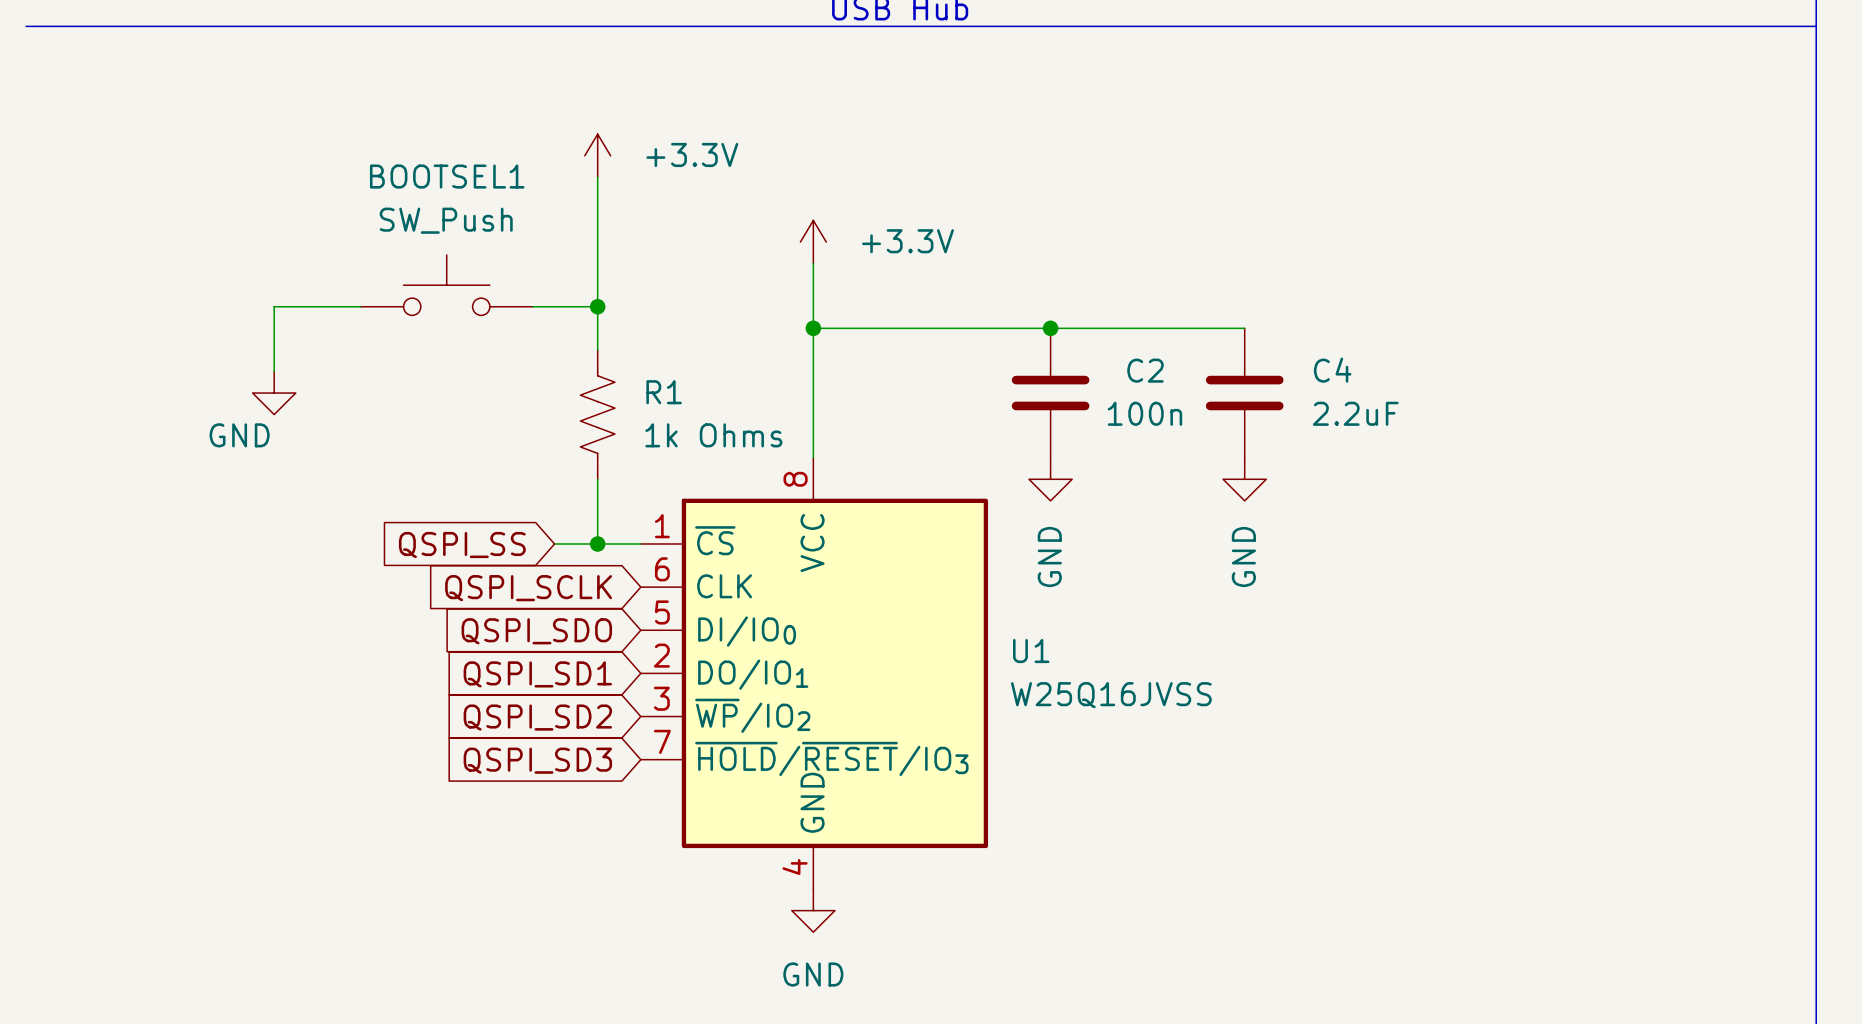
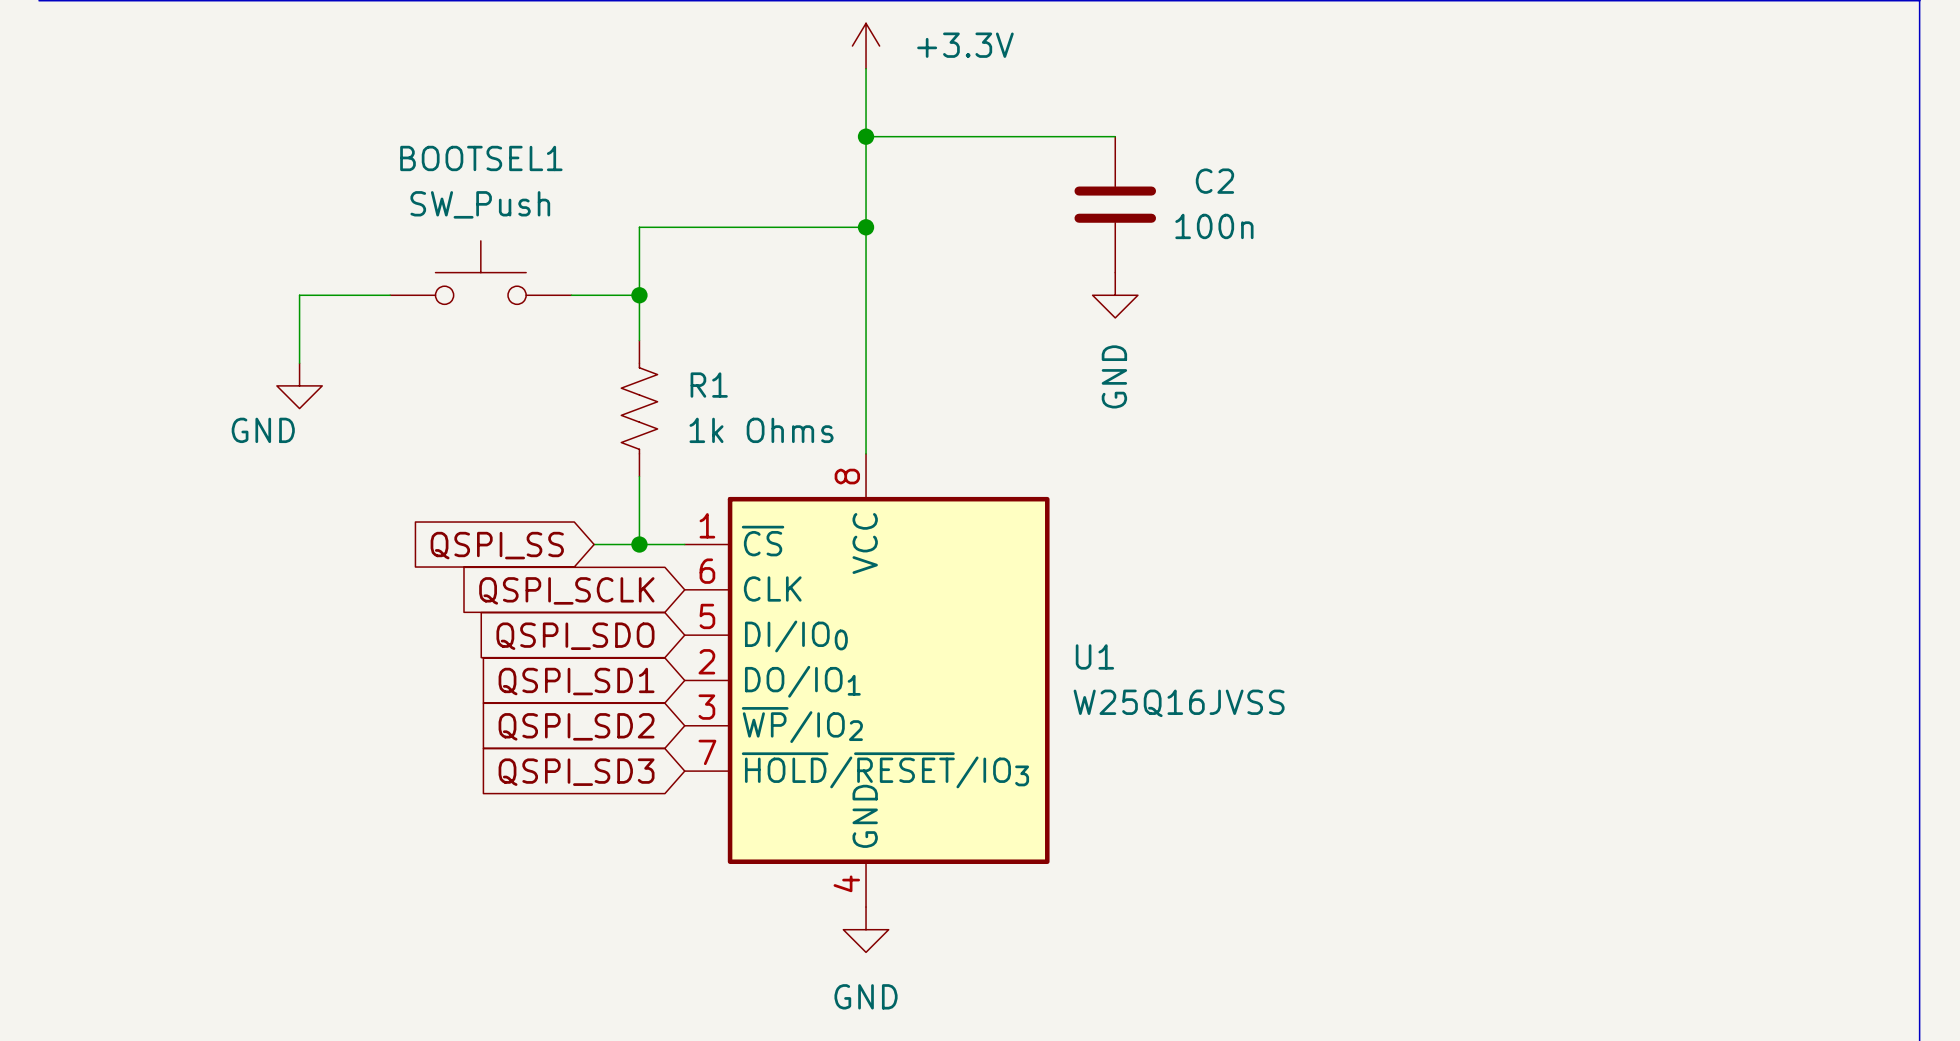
power symbol: none -> +3.3V (866, 46)
wire: none -> (866, 68) (866, 249)
power symbol: +3.3V (597, 155) -> none
wire: none -> (866, 136) (1115, 136)
junction: none -> (866, 136)
wire: (597, 177) (597, 242) -> (866, 227) (639, 227)
junction: none -> (866, 227)
power symbol: +3.3V (813, 242) -> none
power symbol: none -> GND (1115, 295)
wire: (813, 328) (1244, 328) -> none
junction: (813, 328) -> none
junction: (1050, 328) -> none
C2 position: (1050, 393) -> (1115, 204)
C4: 2.2uF (1244, 393) -> none
power symbol: GND (1050, 479) -> none
power symbol: GND (1244, 479) -> none

